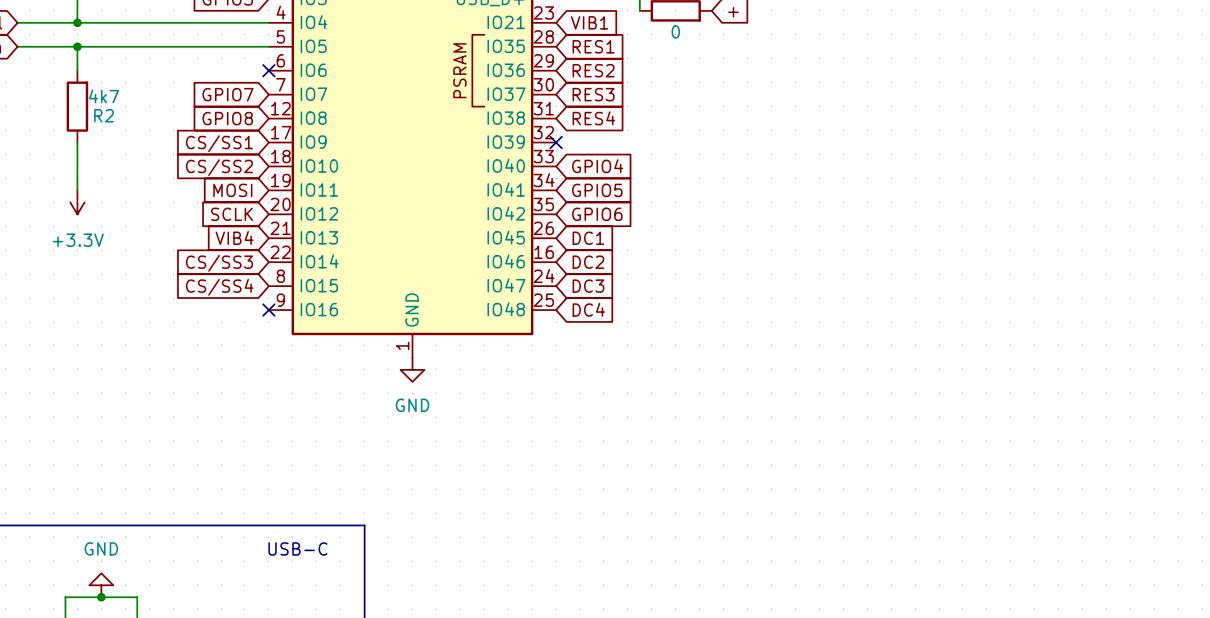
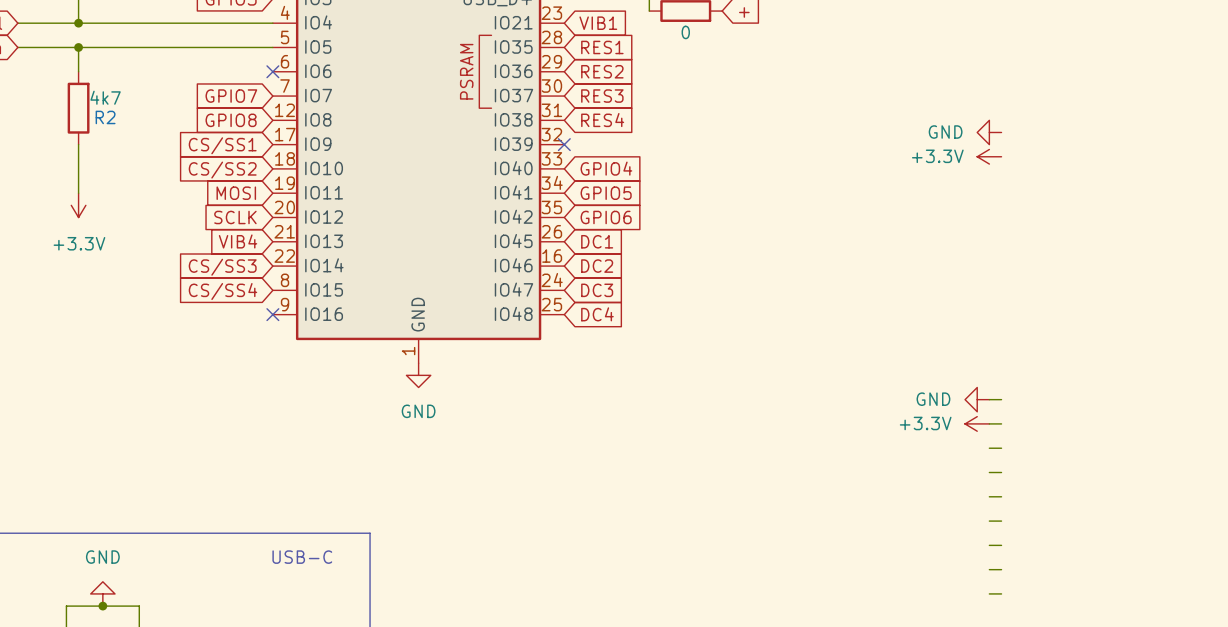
power symbol: none -> GND (989, 132)
power symbol: none -> +3.3V (989, 156)
power symbol: none -> GND (977, 399)
wire: none -> (989, 399) (1001, 399)
power symbol: none -> +3.3V (977, 423)
wire: none -> (989, 423) (1001, 423)
wire: none -> (989, 448) (1001, 448)
wire: none -> (989, 472) (1001, 472)
wire: none -> (989, 496) (1001, 496)
wire: none -> (989, 521) (1001, 521)
wire: none -> (989, 545) (1001, 545)
wire: none -> (989, 569) (1001, 569)
wire: none -> (989, 593) (1001, 593)

